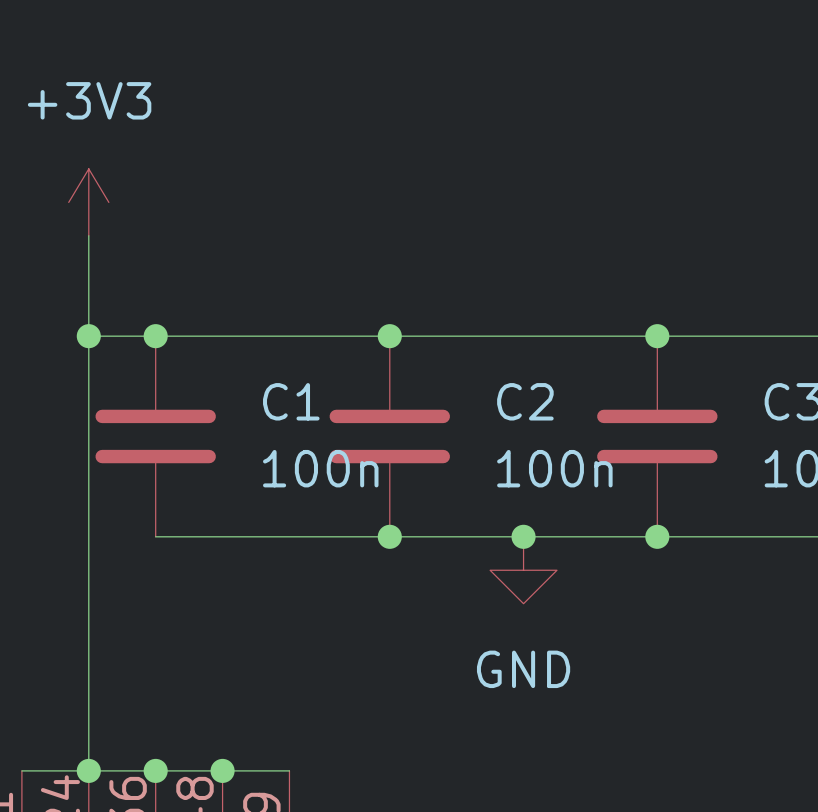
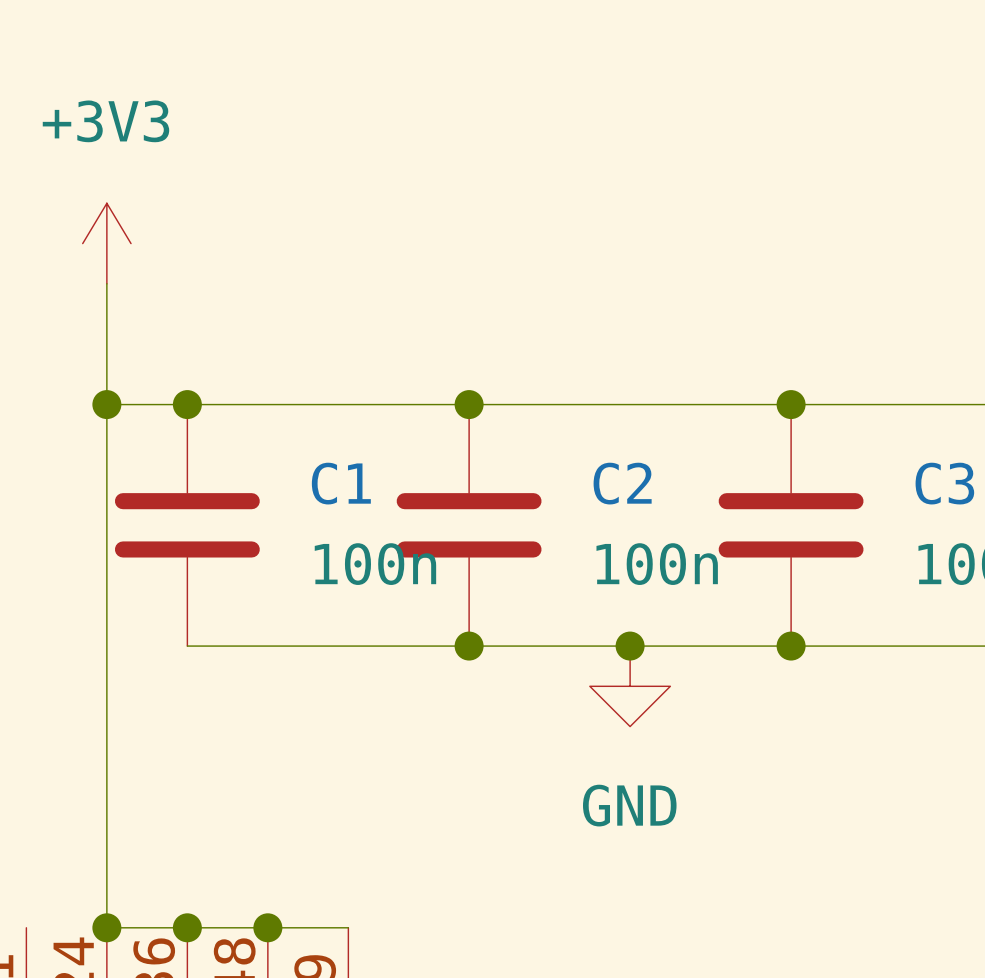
wire: (21, 770) (88, 770) -> none

